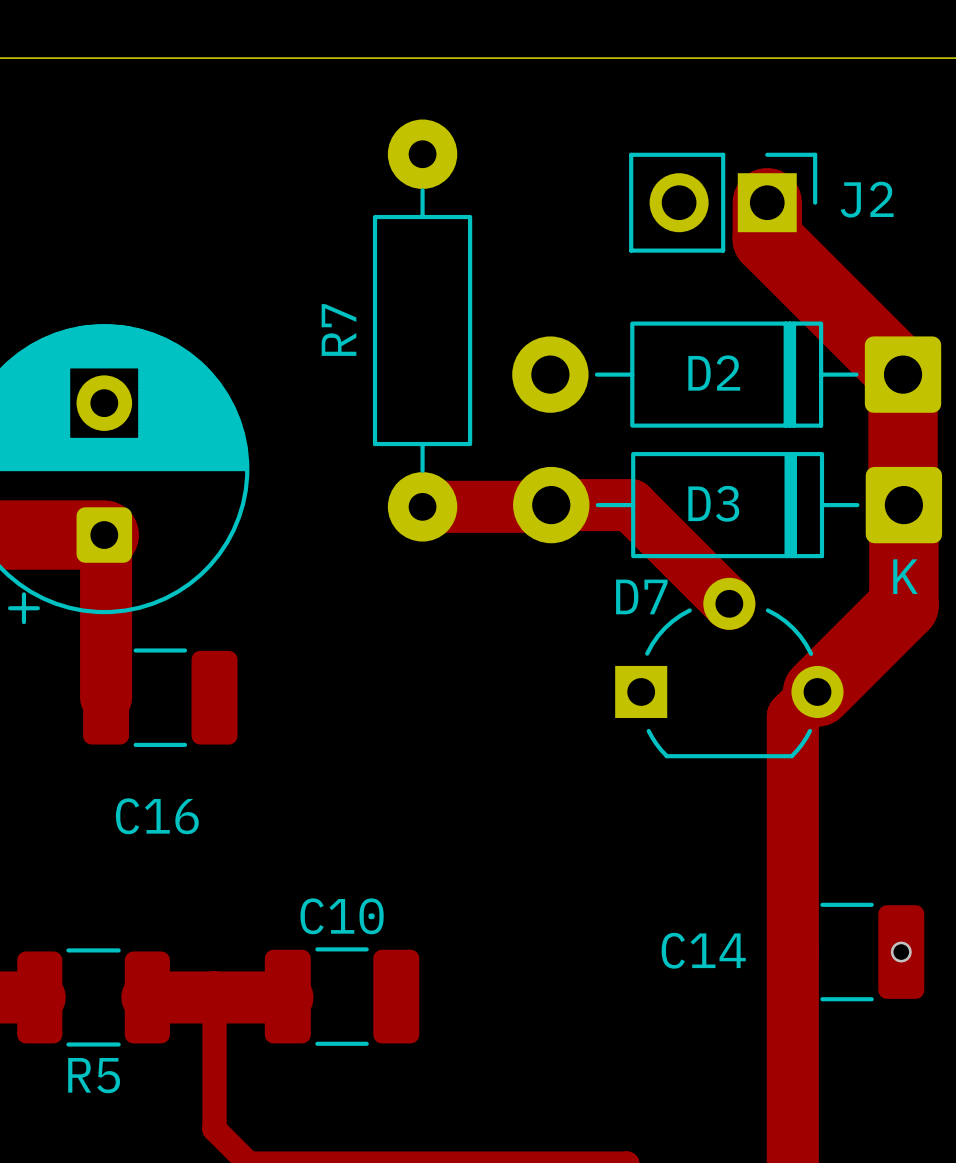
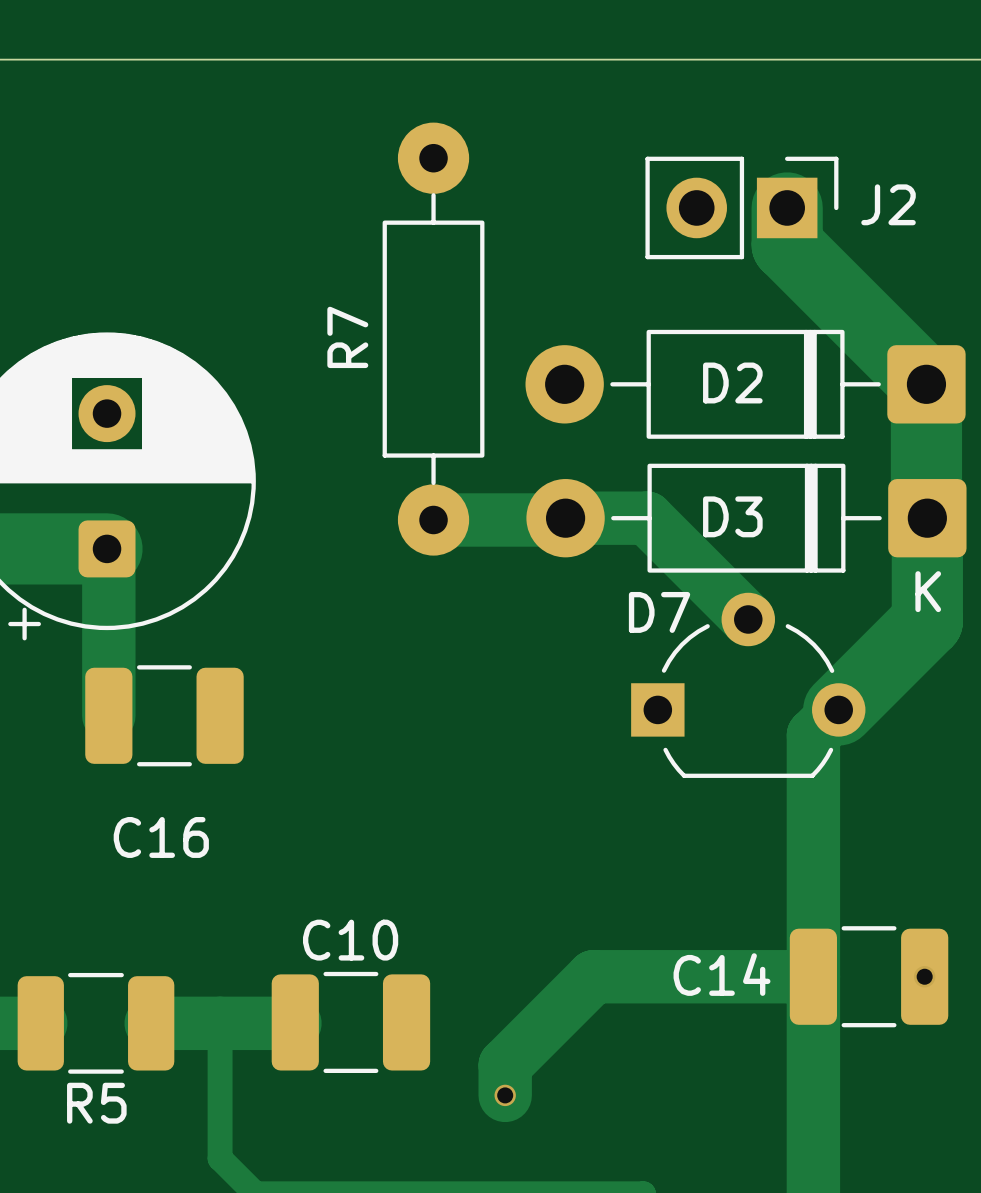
track: none -> (813, 976) (593, 976) (505, 1065) (505, 1095)
via: none -> (505, 1095)

